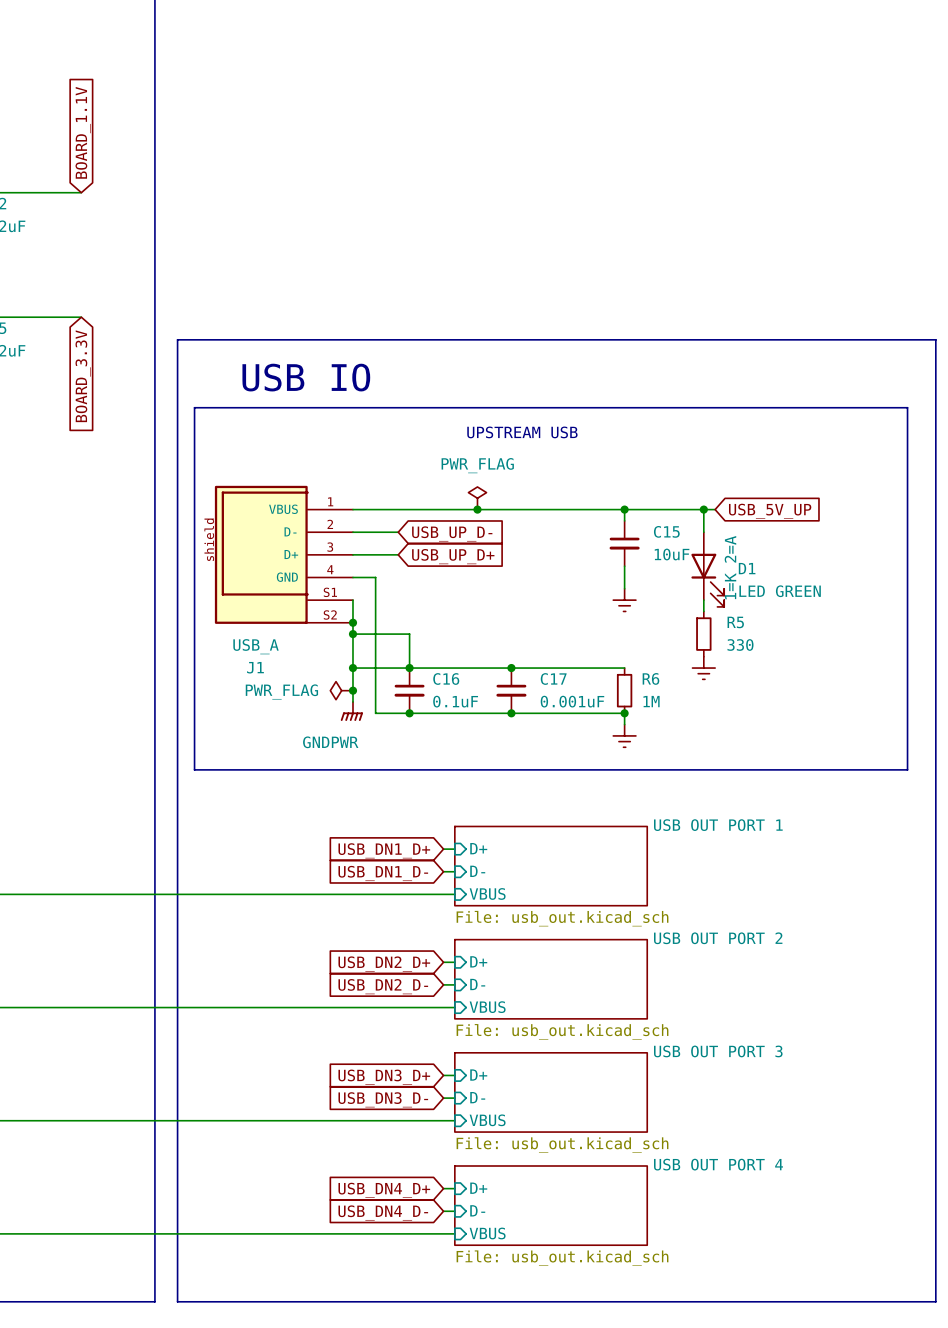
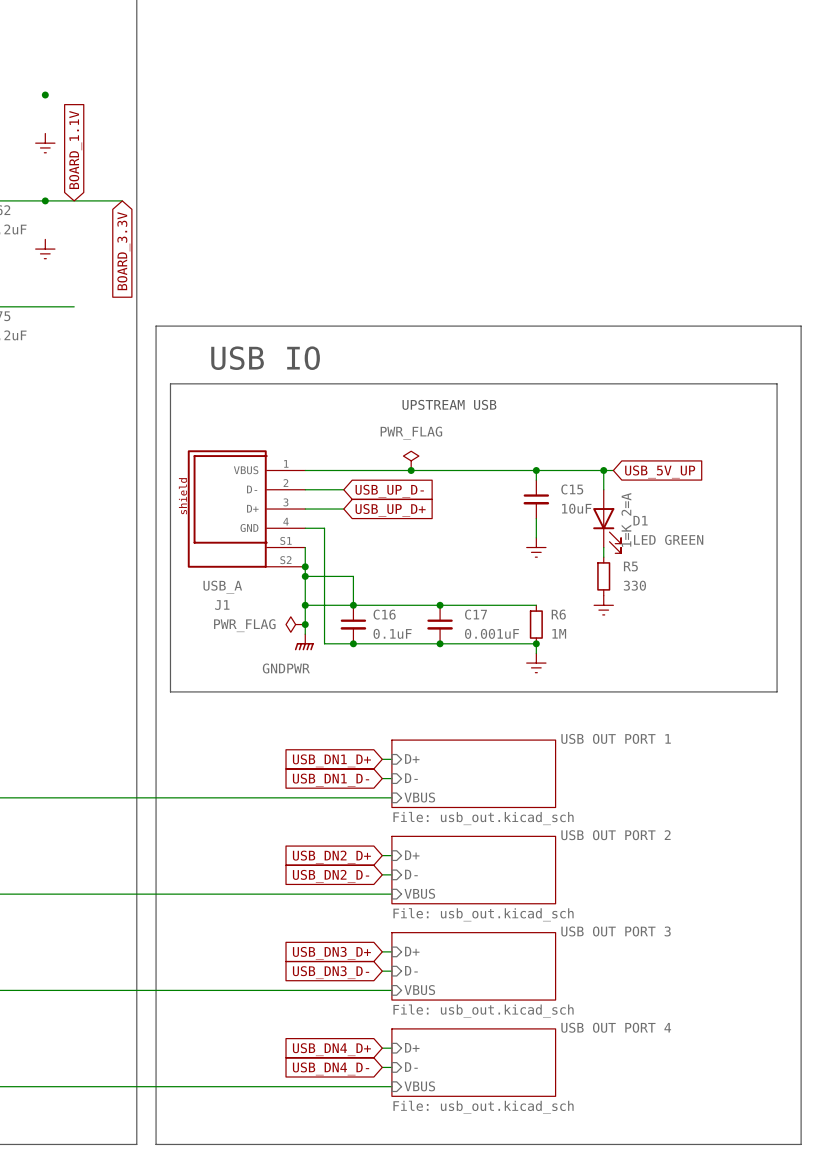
junction: none -> (45, 95)
power symbol: none -> (45, 143)
junction: none -> (45, 200)
wire: none -> (74, 200) (122, 200)
power symbol: none -> (45, 249)
global label position: BOARD_3.3V (83, 376) -> BOARD_3.3V (123, 251)

